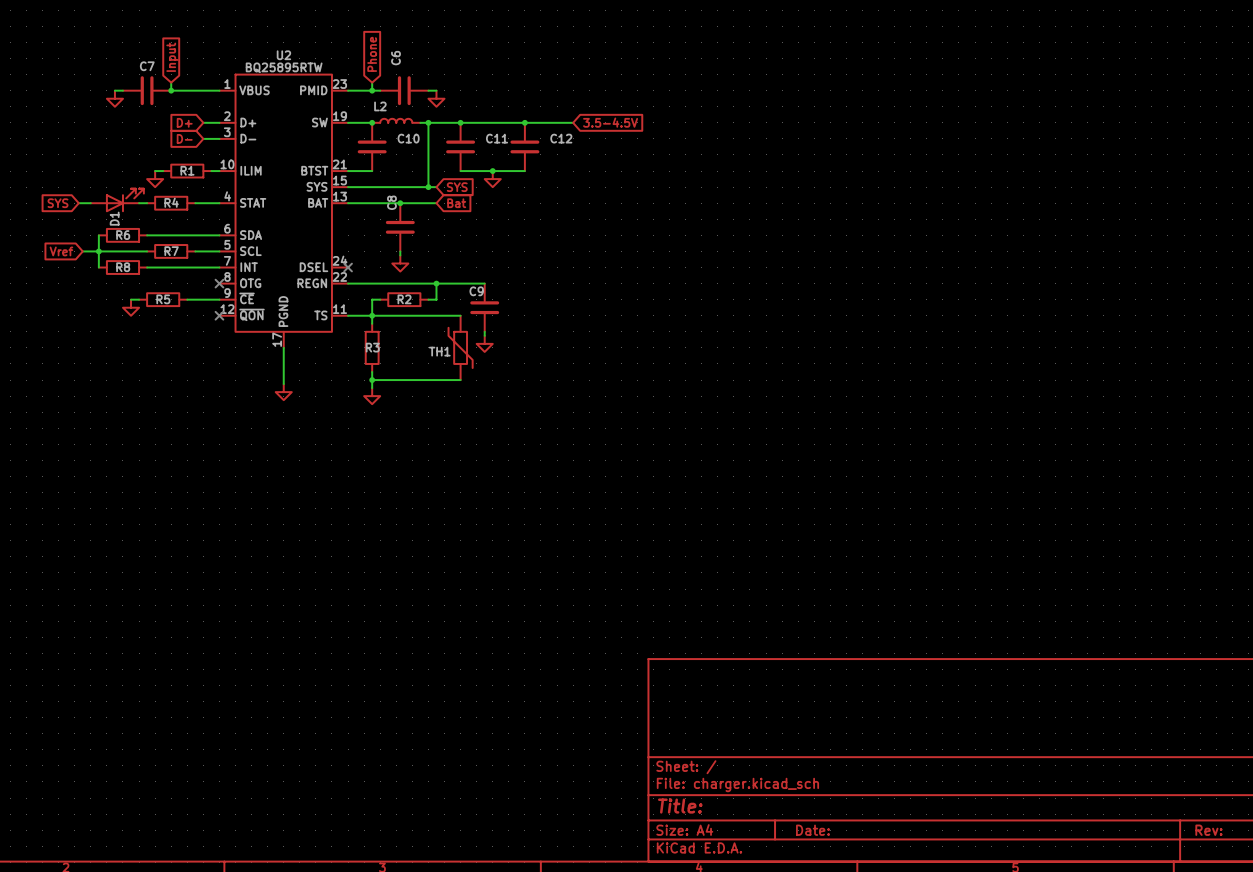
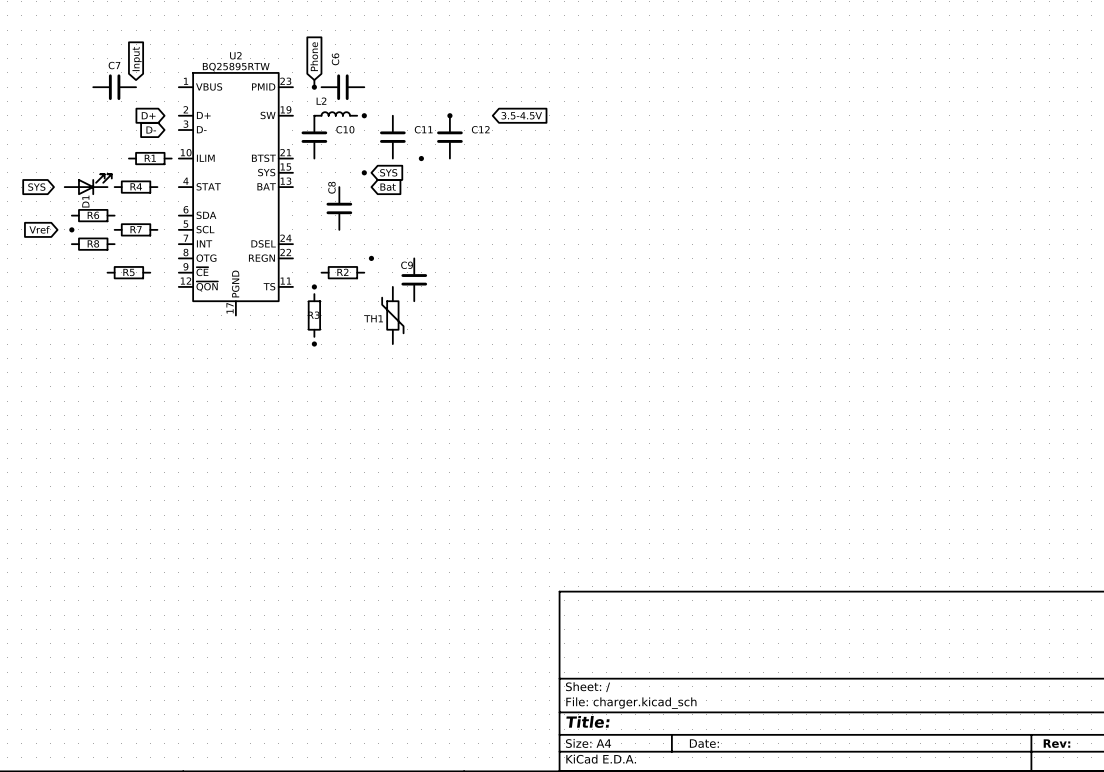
wire: (171, 82) (171, 90) (219, 90) -> none
wire: (114, 90) (122, 90) -> none
junction: (171, 90) -> none
wire: (348, 90) (380, 90) -> none
wire: (428, 90) (436, 90) -> none
power symbol: (114, 98) -> none
power symbol: (436, 98) -> none
wire: (203, 122) (219, 122) -> none
wire: (348, 122) (372, 122) -> none
junction: (372, 122) -> none
wire: (420, 122) (573, 122) -> none
wire: (428, 122) (428, 187) -> none
junction: (460, 122) -> none
wire: (203, 138) (219, 138) -> none
wire: (155, 171) (163, 171) -> none
wire: (211, 171) (219, 171) -> none
wire: (348, 171) (372, 171) -> none
wire: (460, 171) (524, 171) -> none
power symbol: (155, 179) -> none
power symbol: (492, 179) -> none
wire: (348, 187) (436, 187) -> none
wire: (78, 203) (90, 203) -> none
wire: (139, 203) (147, 203) -> none
wire: (195, 203) (219, 203) -> none
wire: (348, 203) (436, 203) -> none
junction: (400, 203) -> none
wire: (98, 235) (98, 267) -> none
wire: (147, 235) (219, 235) -> none
wire: (82, 251) (147, 251) -> none
wire: (195, 251) (219, 251) -> none
wire: (400, 251) (400, 255) -> none
power symbol: (400, 263) -> none
wire: (147, 267) (219, 267) -> none
no-connect mark: (348, 267) -> none
no-connect mark: (219, 283) -> none
wire: (348, 283) (484, 283) -> none
wire: (436, 283) (436, 299) (428, 299) -> none
wire: (131, 299) (139, 299) -> none
wire: (187, 299) (219, 299) -> none
wire: (380, 299) (372, 299) (372, 323) -> none
power symbol: (131, 307) -> none
no-connect mark: (219, 315) -> none
wire: (348, 315) (460, 315) -> none
wire: (484, 331) (484, 335) -> none
power symbol: (484, 343) -> none
wire: (283, 347) (283, 384) -> none
wire: (372, 372) (372, 388) -> none
wire: (372, 380) (460, 380) -> none
power symbol: (283, 392) -> none
power symbol: (372, 396) -> none

